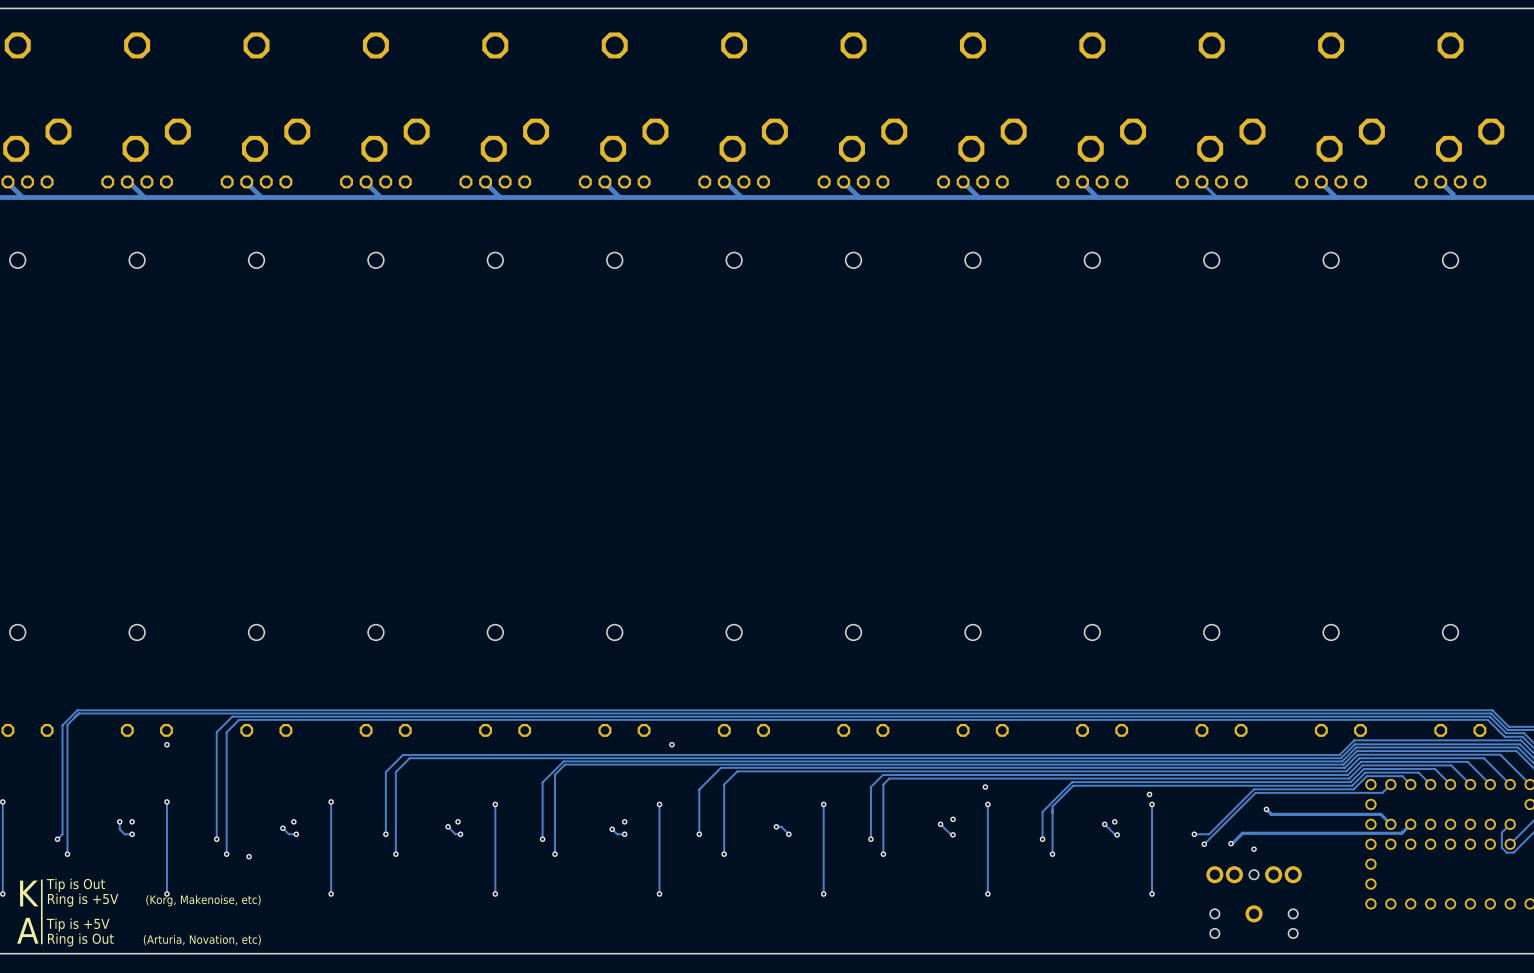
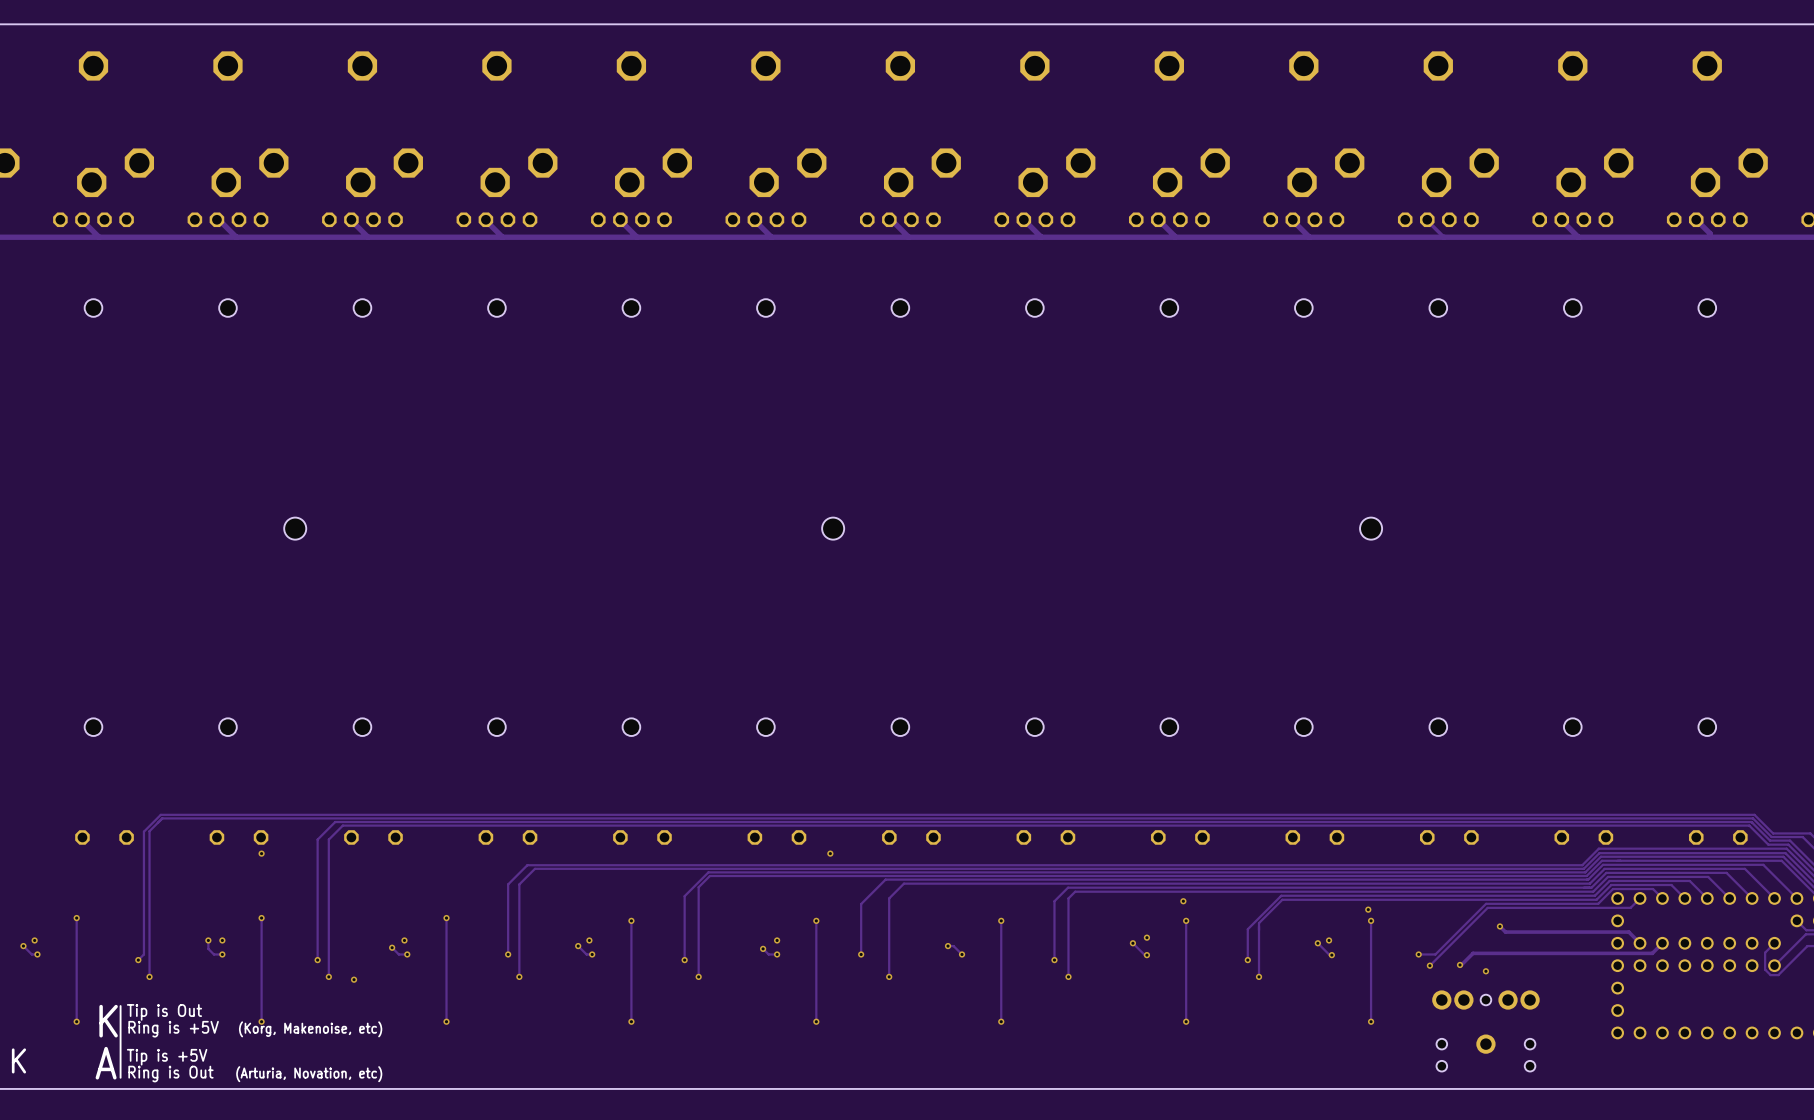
hole: none -> (295, 528)
hole: none -> (833, 528)
hole: none -> (1371, 528)

